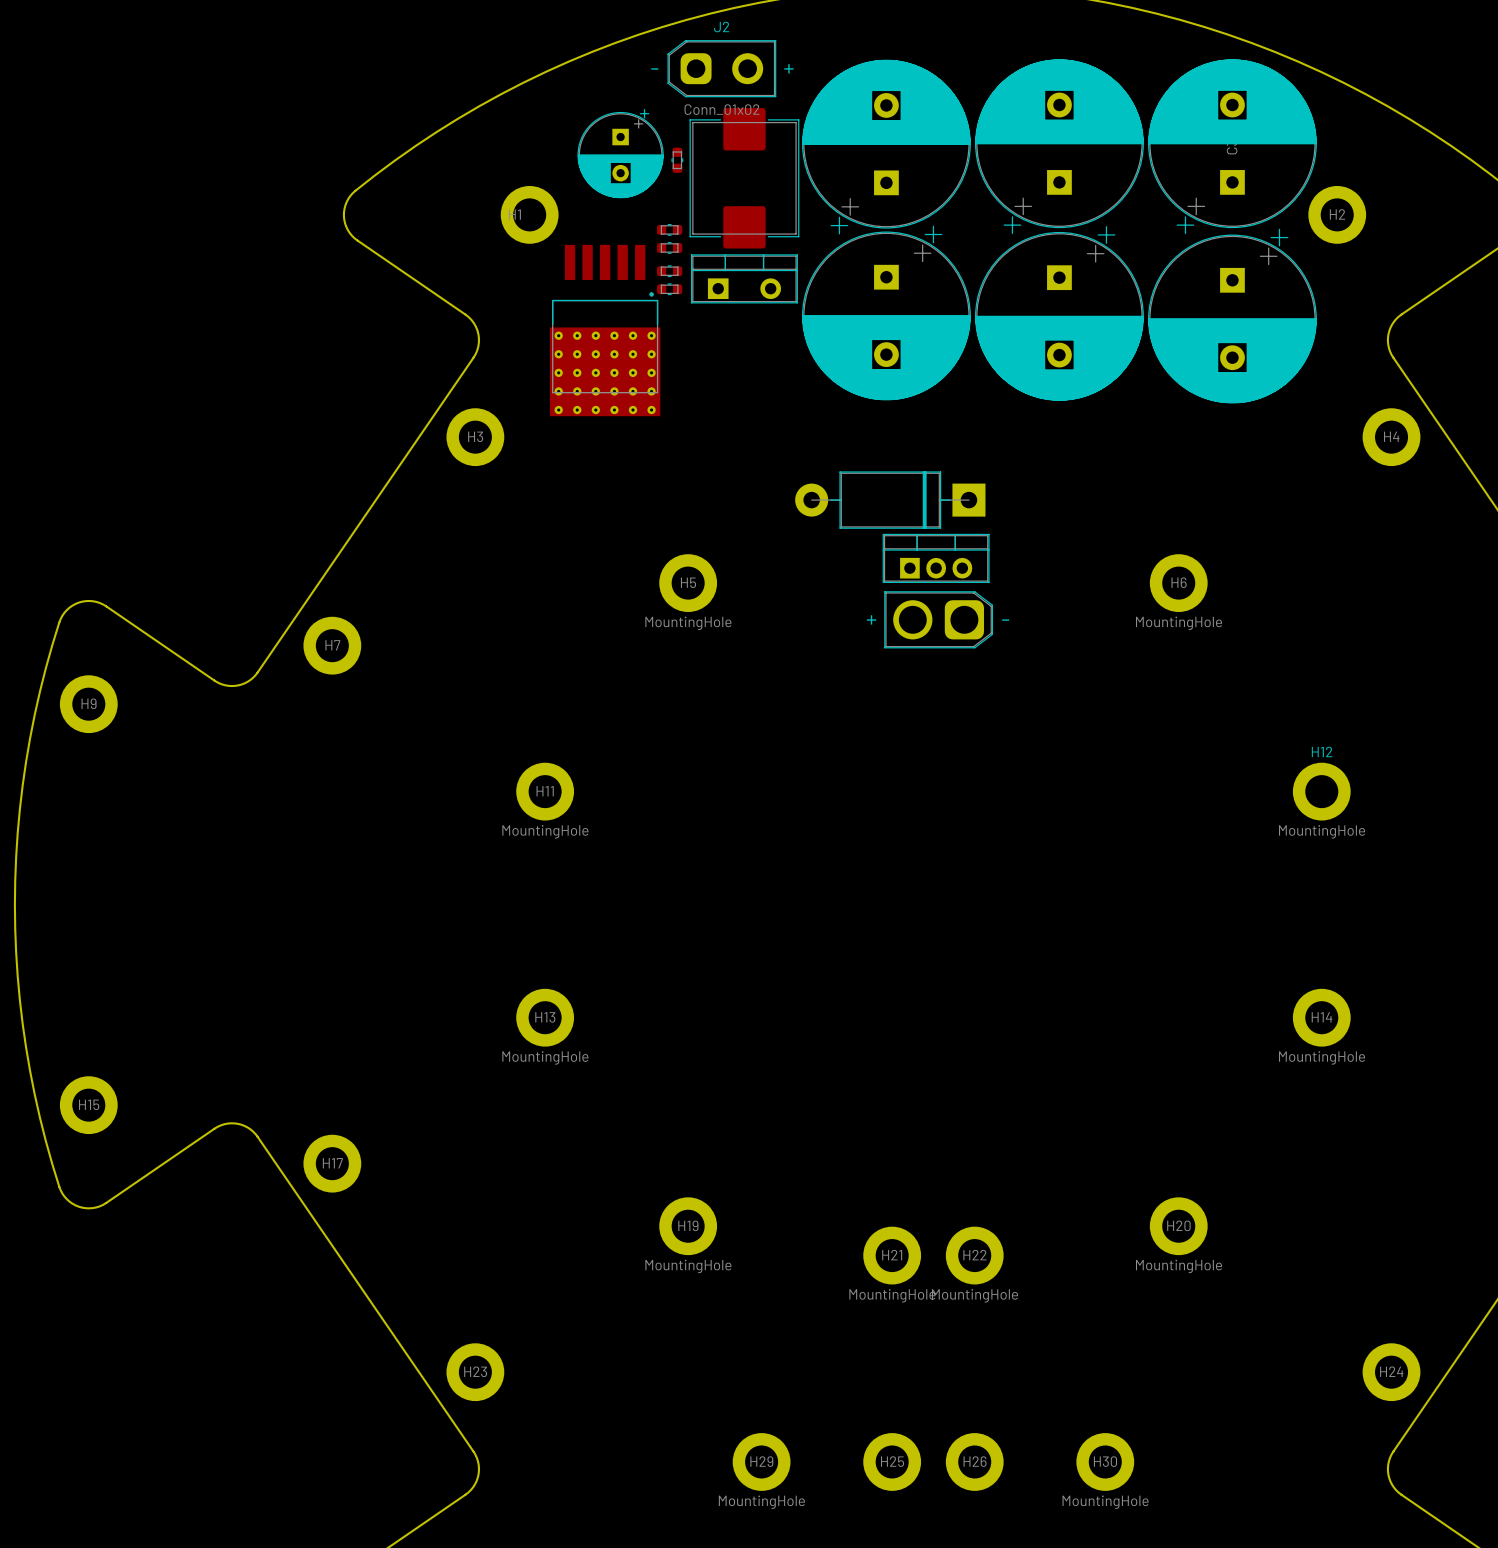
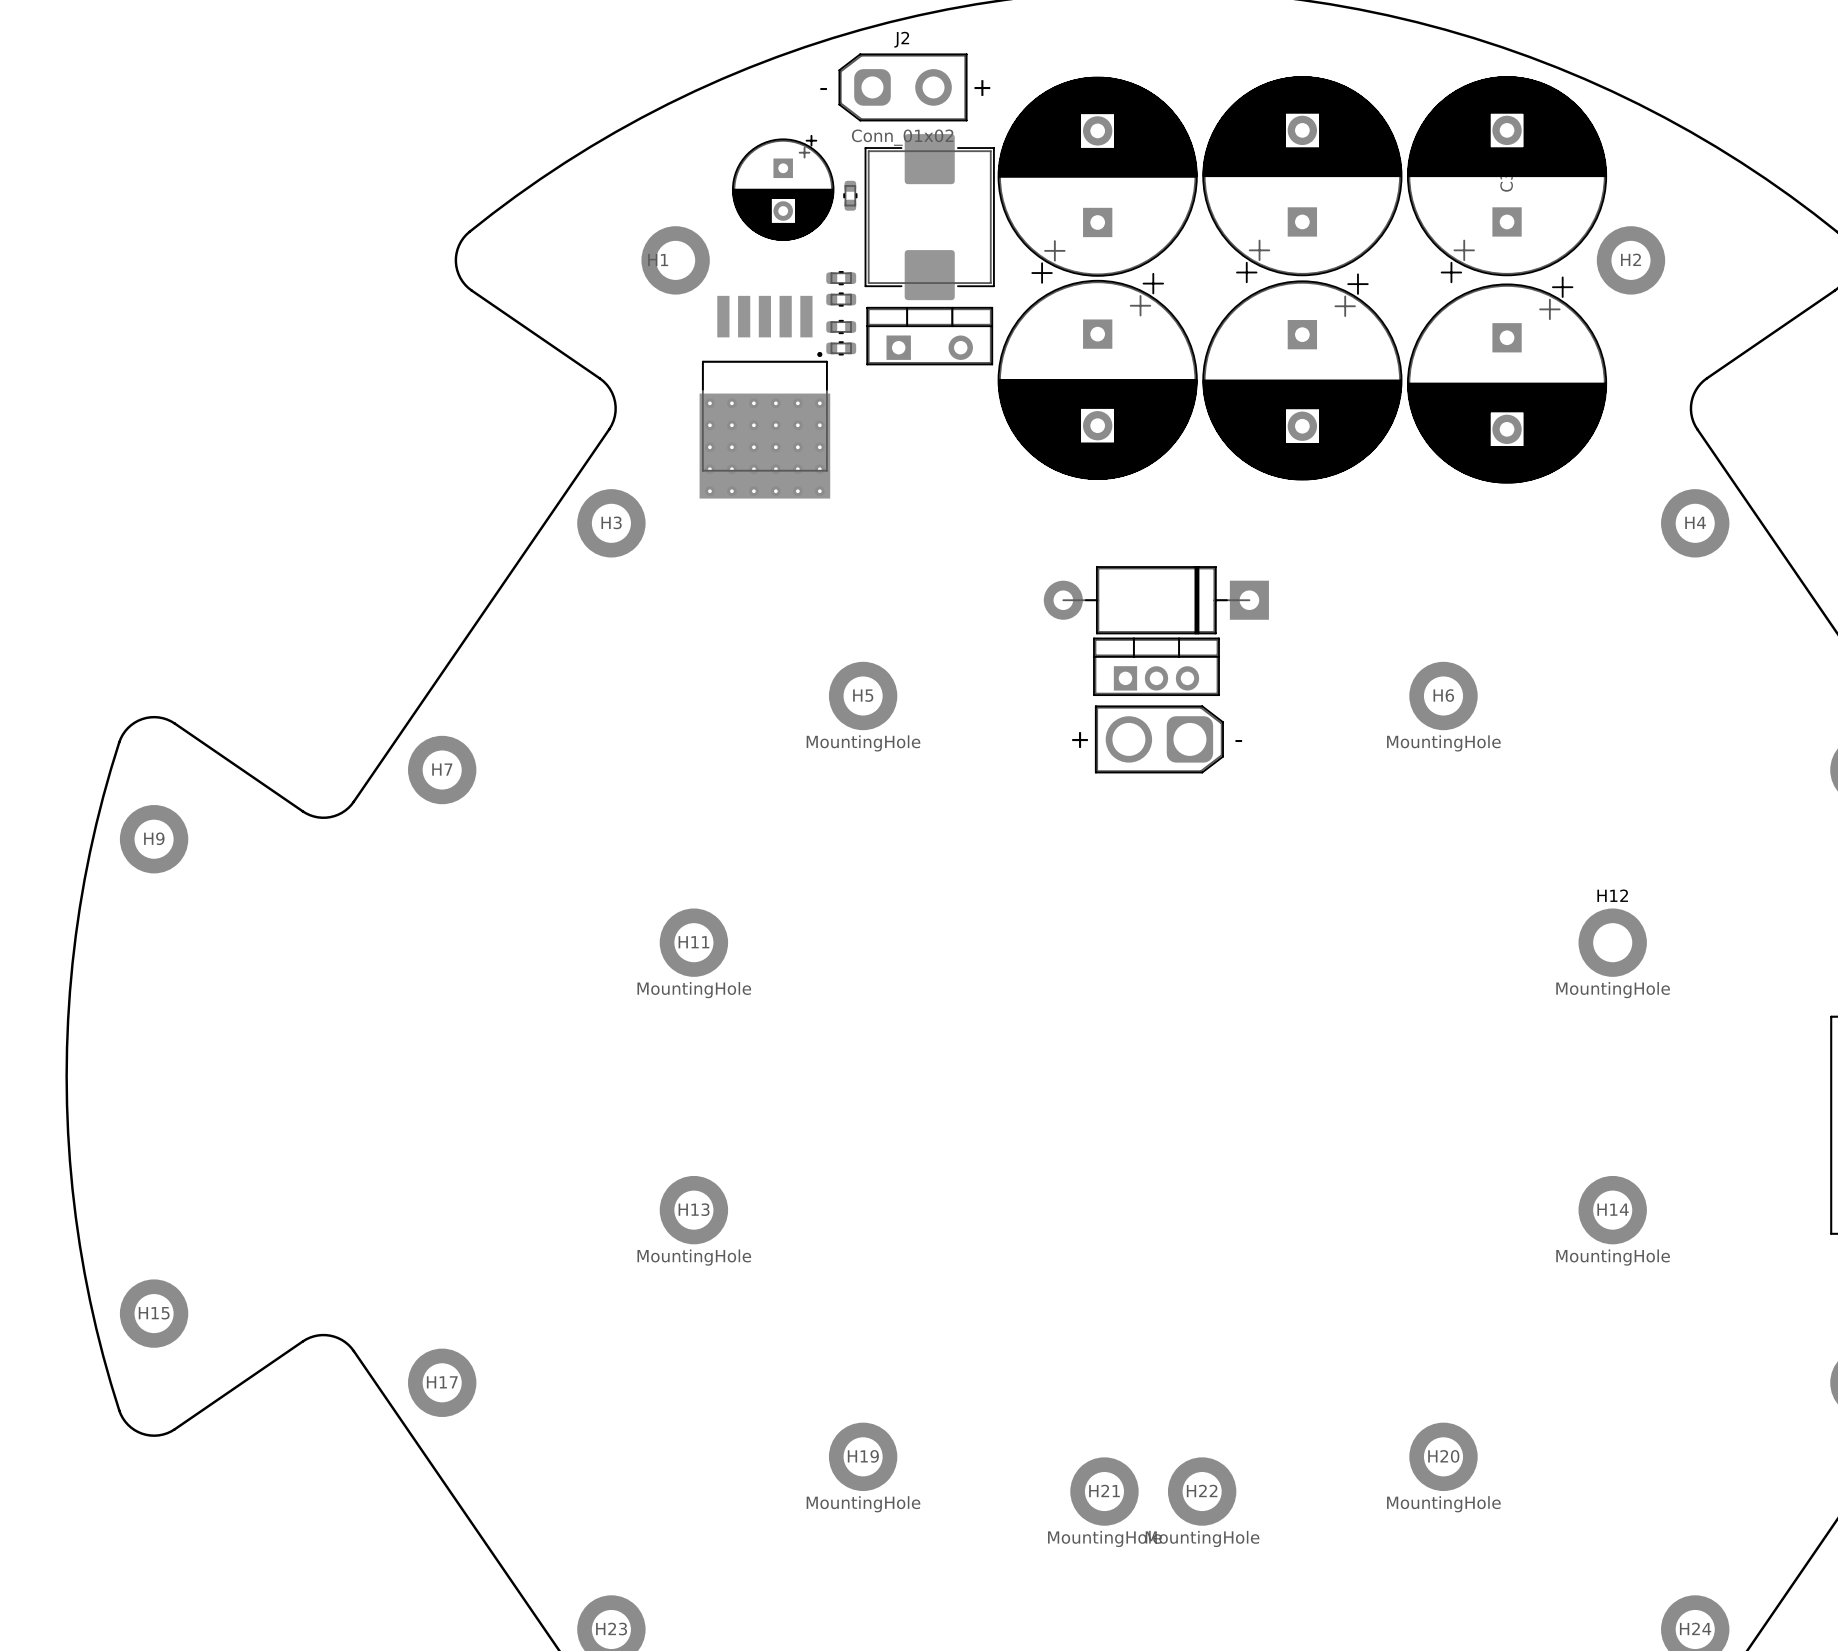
part position: (890, 500) -> (1156, 600)

